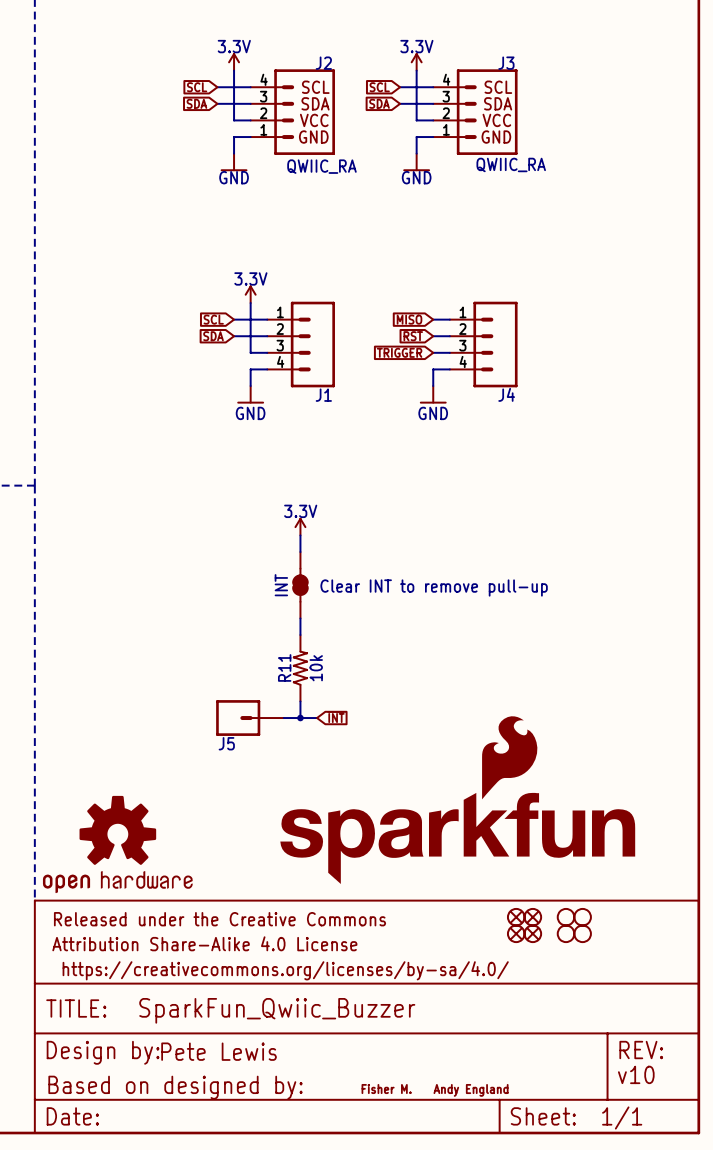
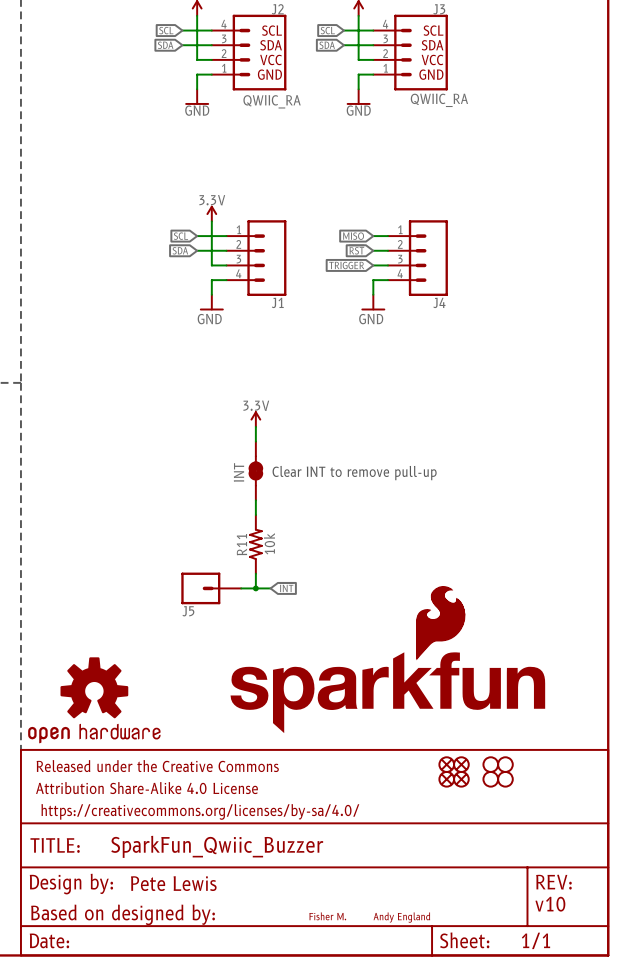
part: none -> (387, 659)
part: (457, 838) -> none

